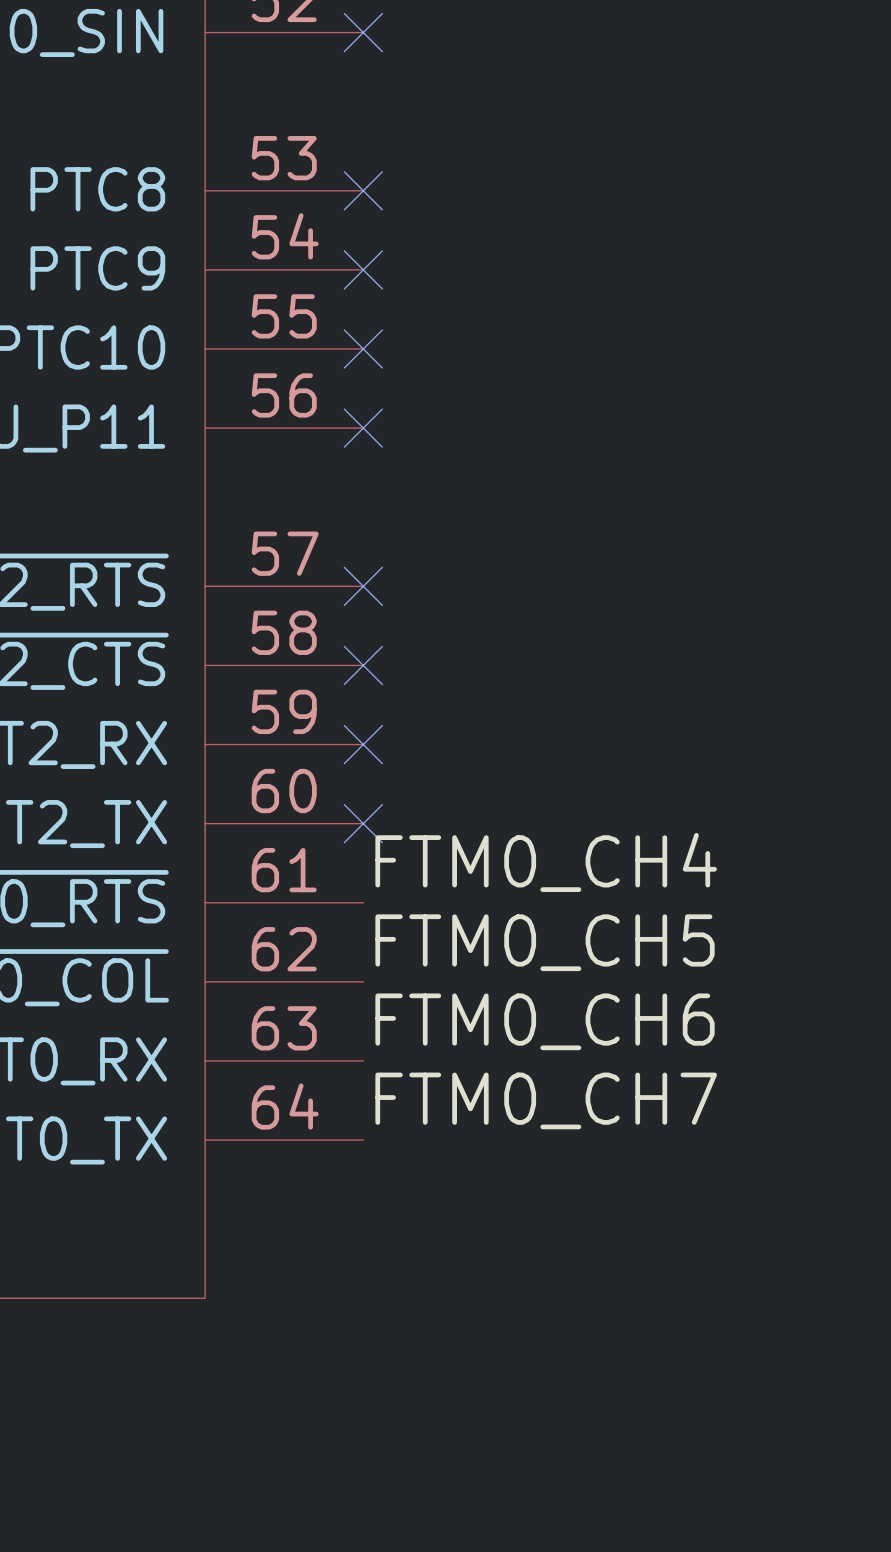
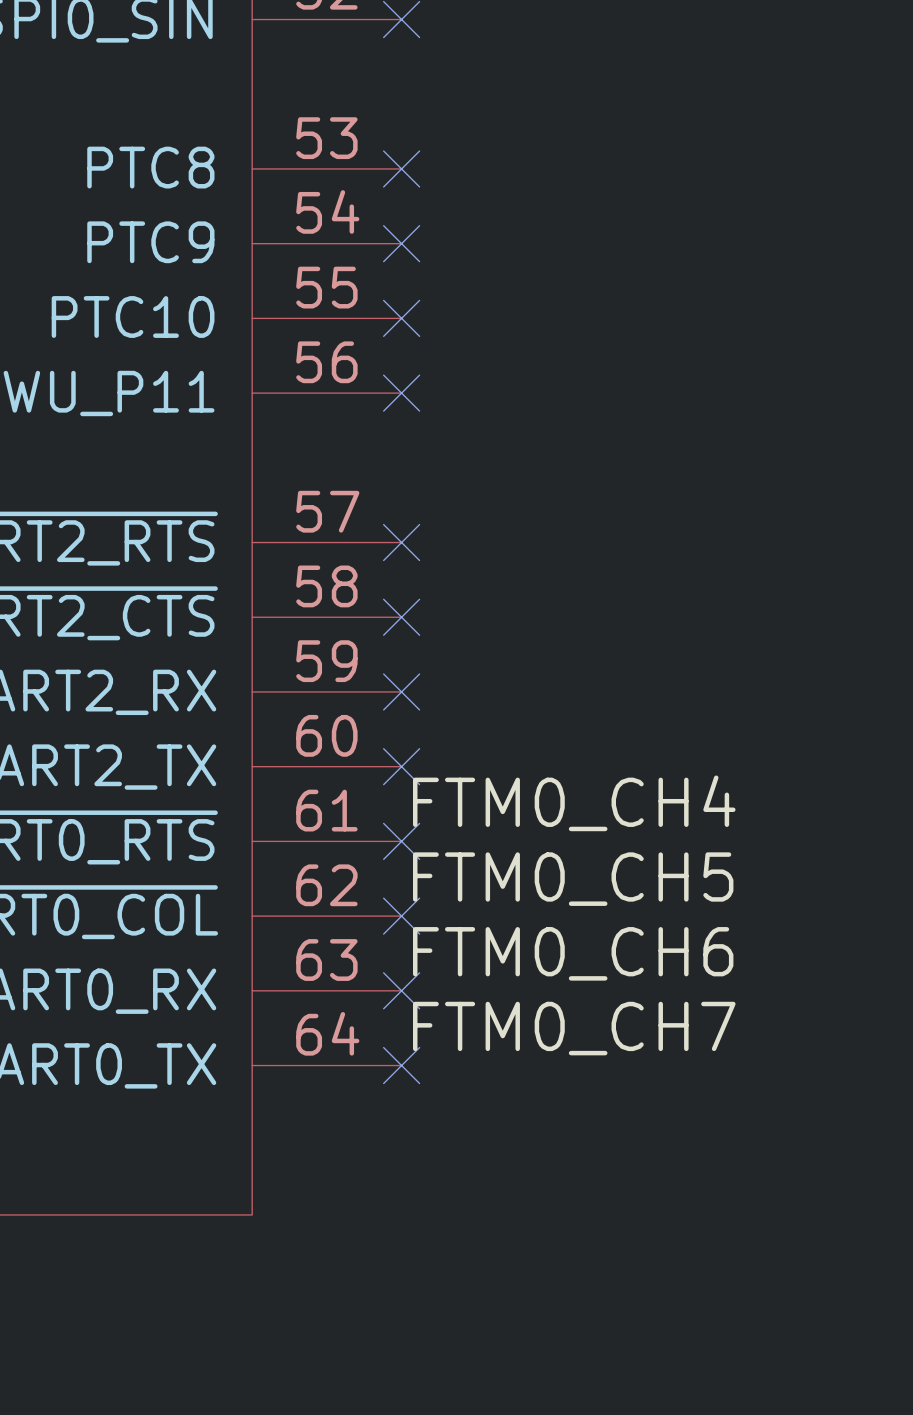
no-connect mark: none -> (401, 841)
no-connect mark: none -> (401, 916)
no-connect mark: none -> (401, 990)
no-connect mark: none -> (401, 1065)

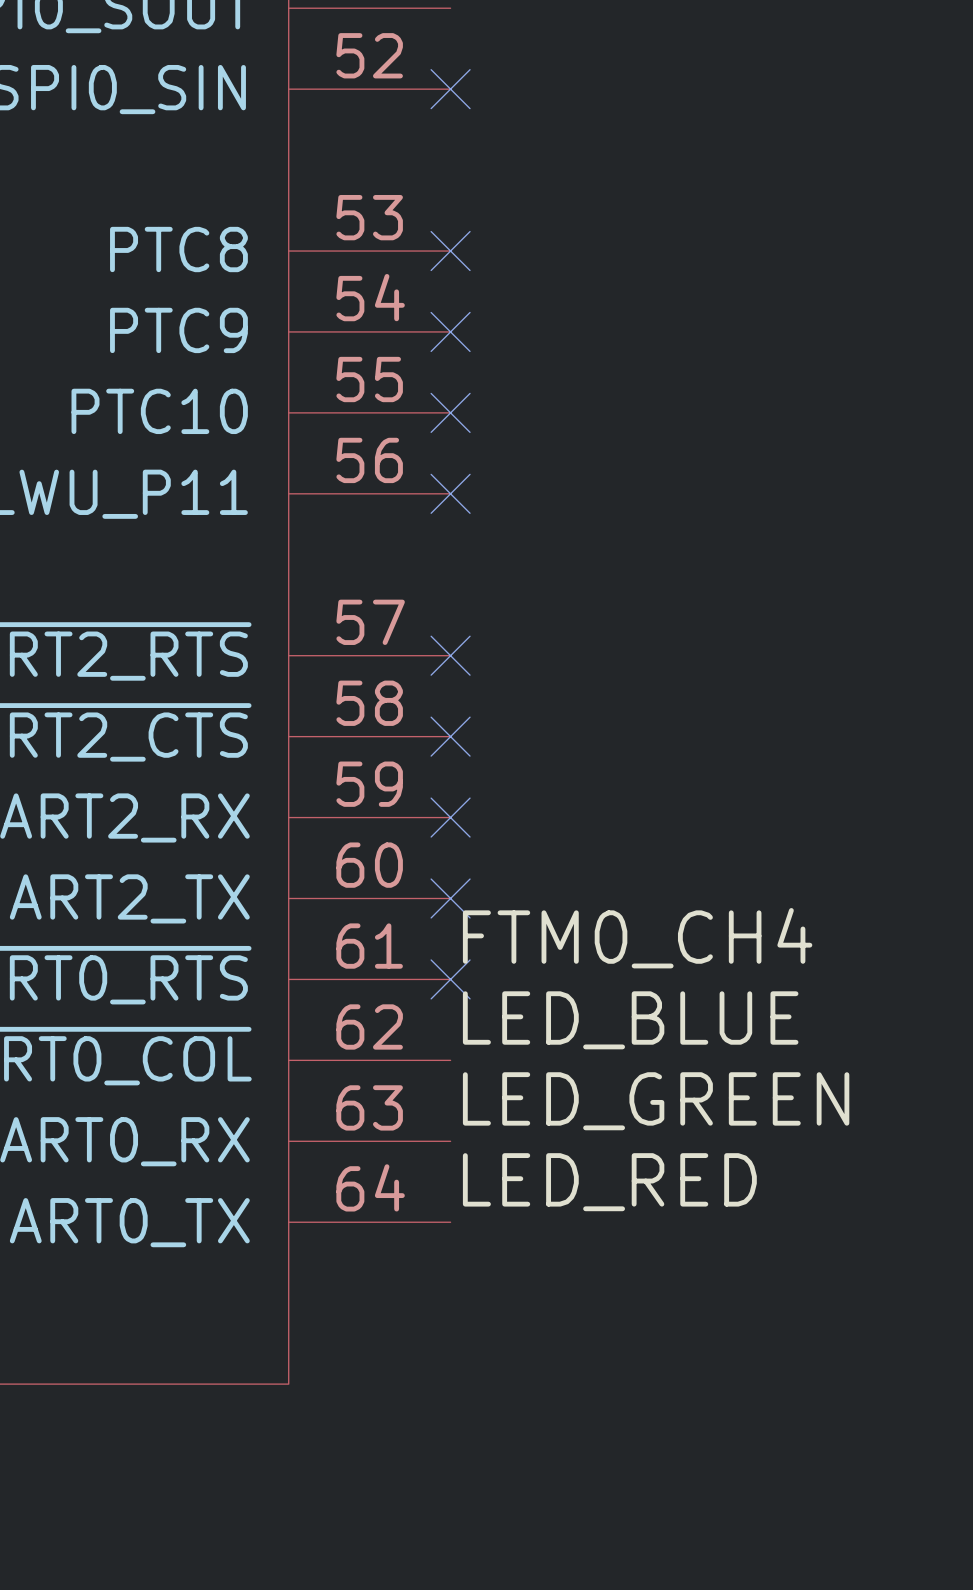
label: FTM0_CH5 (573, 879) -> LED_BLUE (630, 1020)
no-connect mark: (401, 916) -> none
label: FTM0_CH6 (573, 953) -> LED_GREEN (656, 1101)
no-connect mark: (401, 990) -> none
label: FTM0_CH7 (574, 1028) -> LED_RED (609, 1182)
no-connect mark: (401, 1065) -> none

